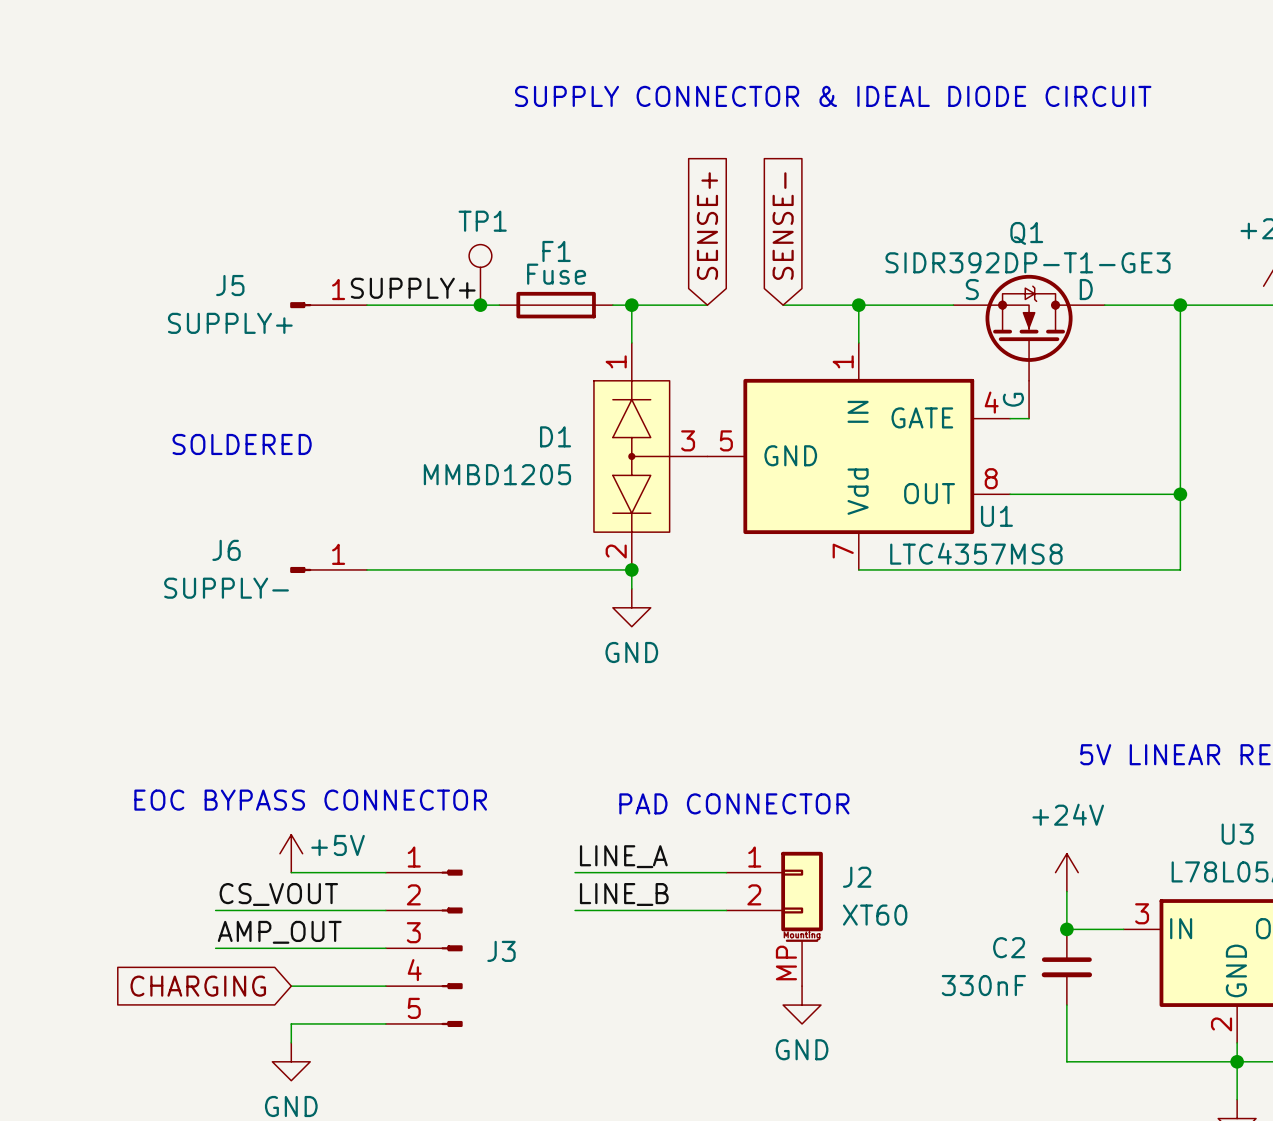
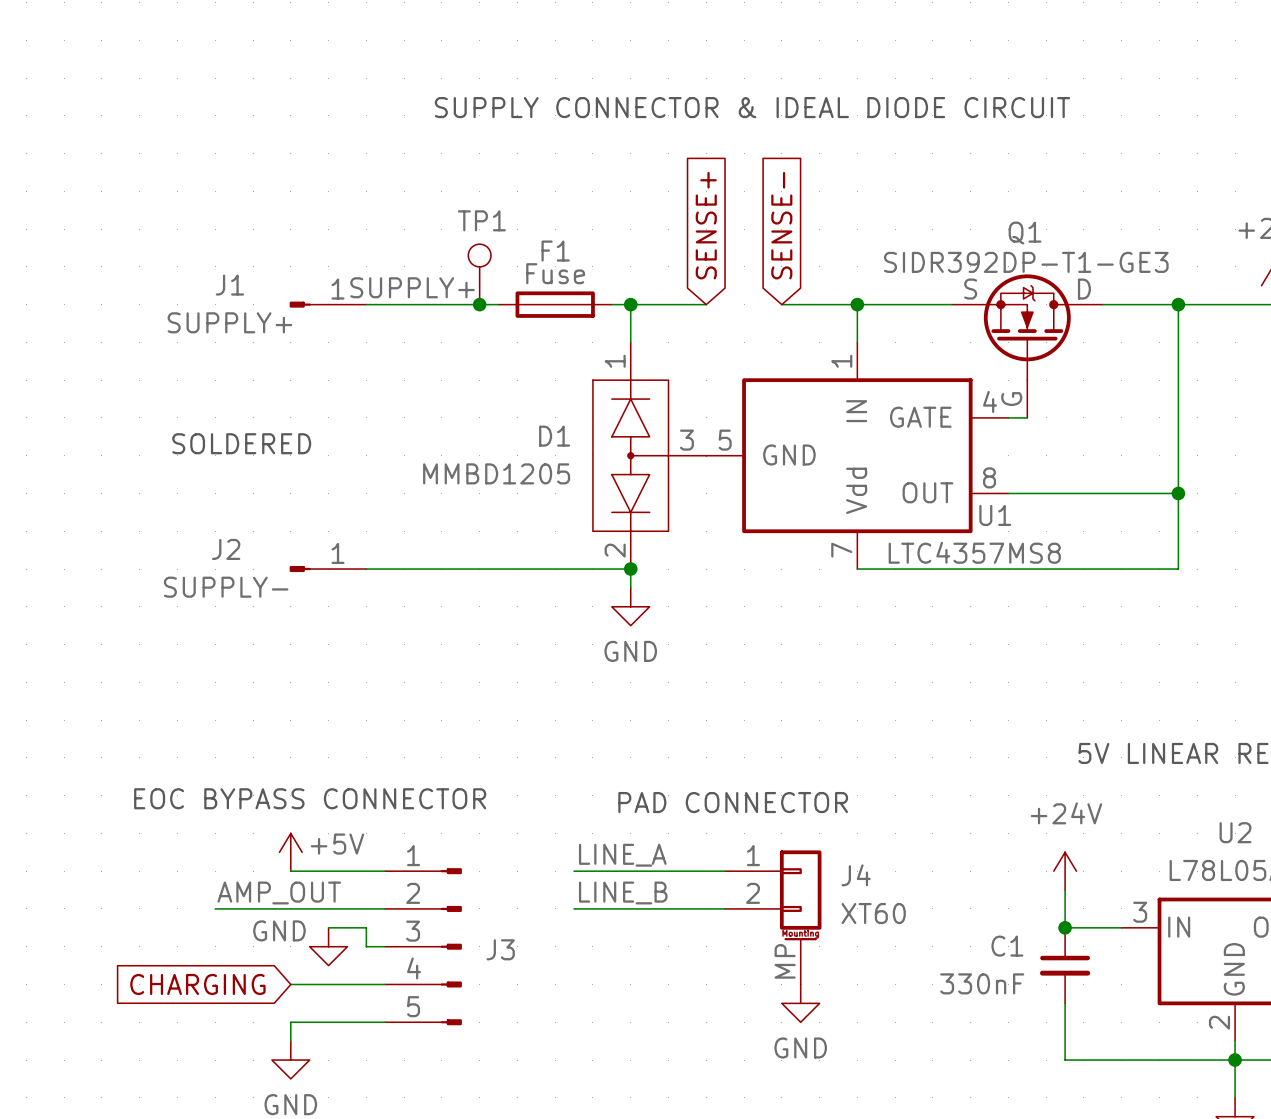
text position: SUPPLY CONNECTOR & IDEAL DIODE CIRCUIT (833, 96) -> SUPPLY CONNECTOR & IDEAL DIODE CIRCUIT (752, 107)
J5 name: J5 (230, 285) -> J1 (229, 285)
J6 name: J6 (226, 550) -> J2 (226, 549)
U3 name: U3 (1237, 834) -> U2 (1235, 832)
J2 name: J2 (857, 877) -> J4 (856, 875)
label: CS_VOUT (278, 894) -> AMP_OUT (279, 892)
label: AMP_OUT (279, 932) -> none
C2 name: C2 (1009, 947) -> C1 (1007, 946)
wire: (215, 948) (366, 948) -> (328, 927) (366, 927) (366, 946)
power symbol: none -> GND (328, 946)

